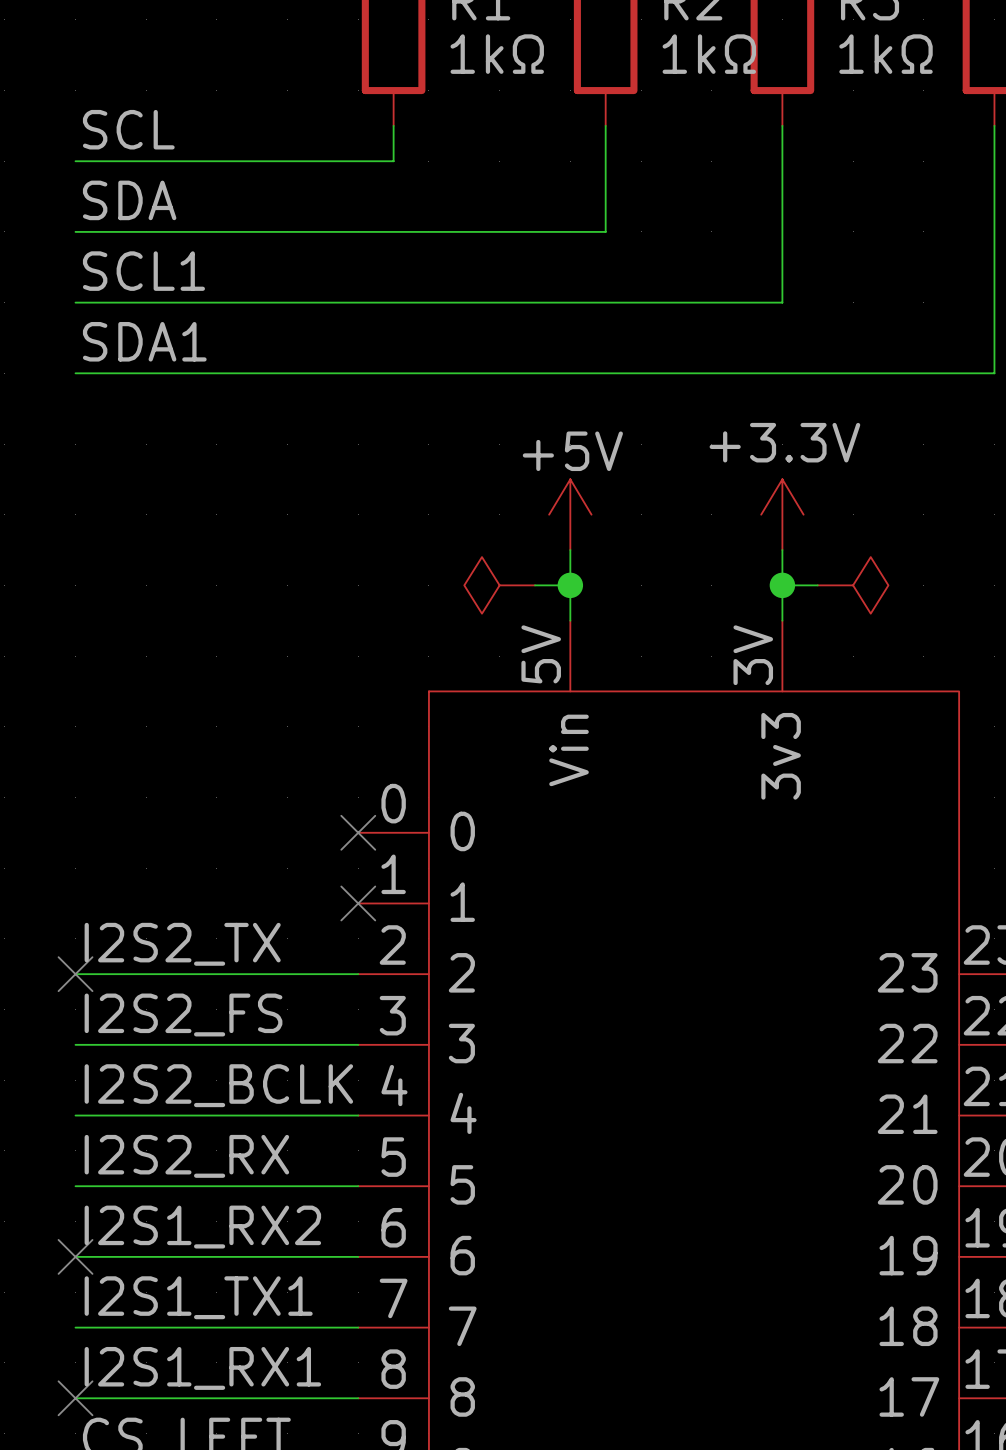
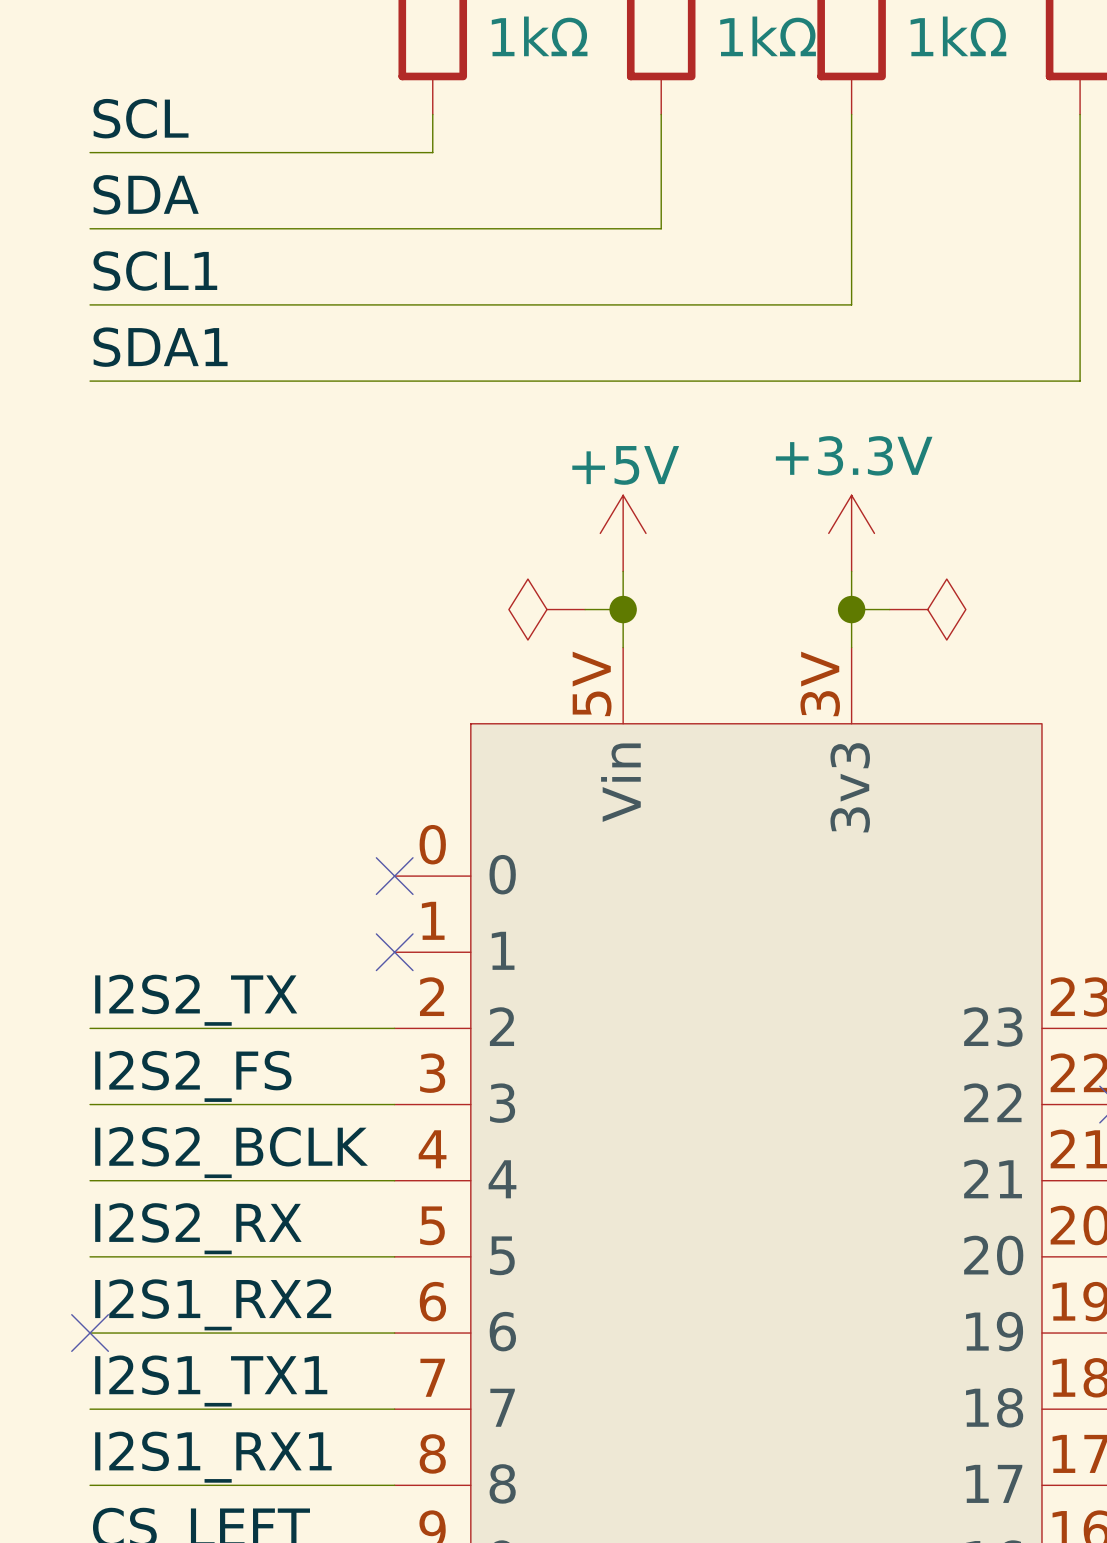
no-connect mark: (75, 974) -> none
no-connect mark: (75, 1398) -> none

